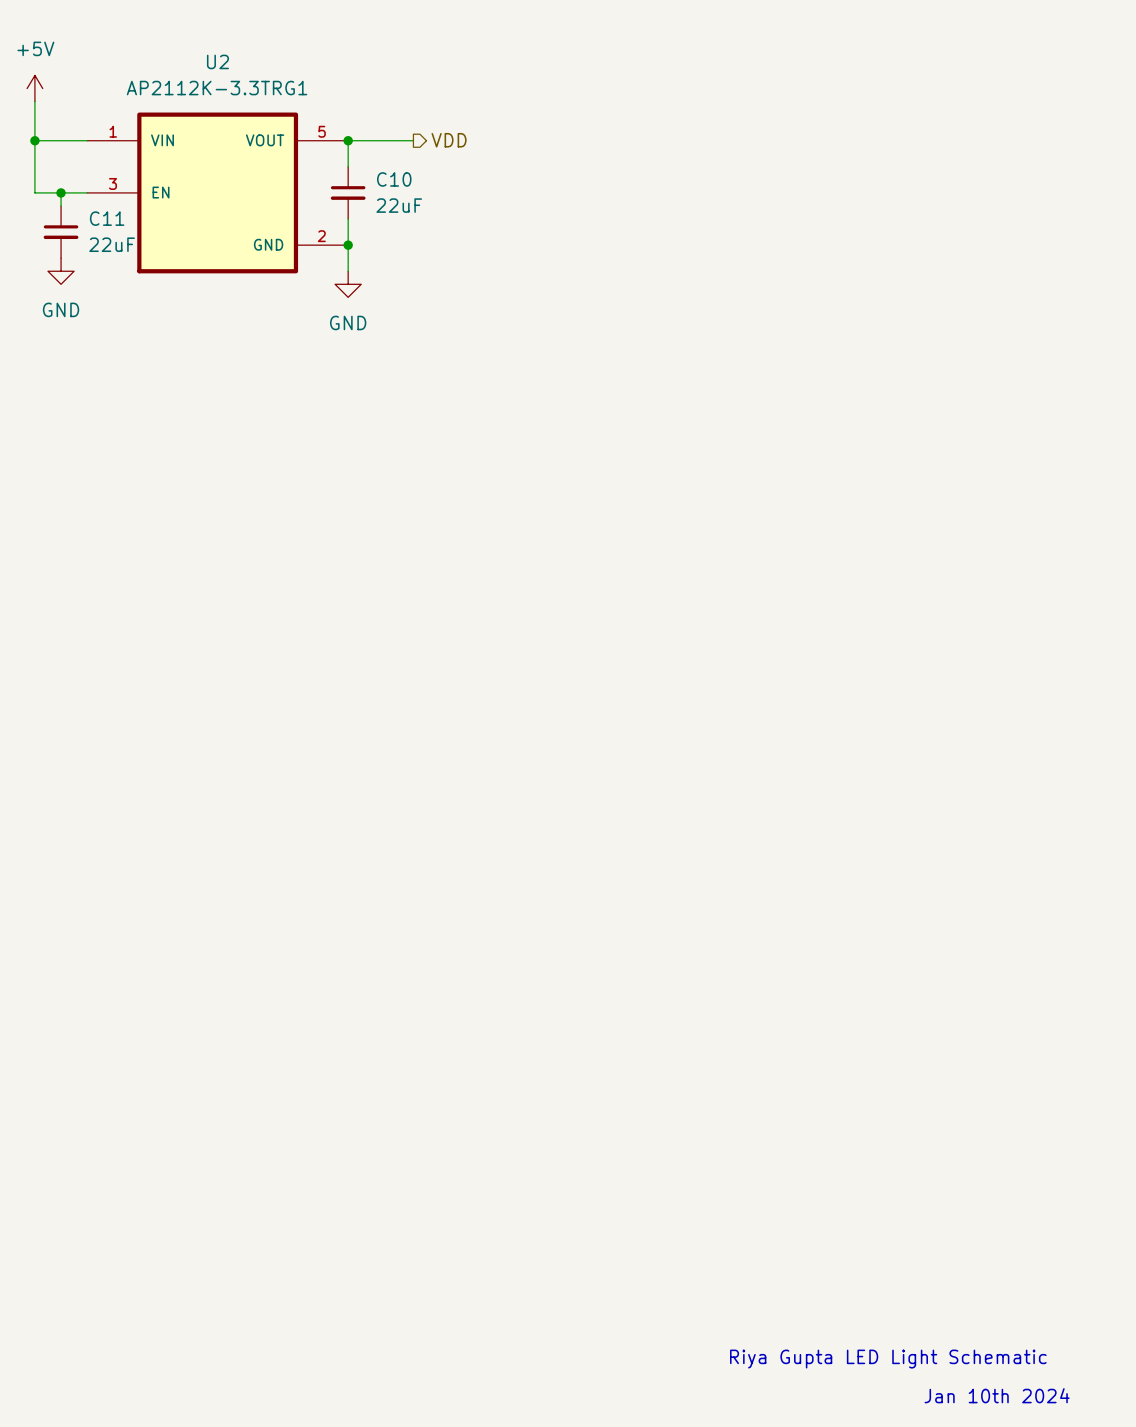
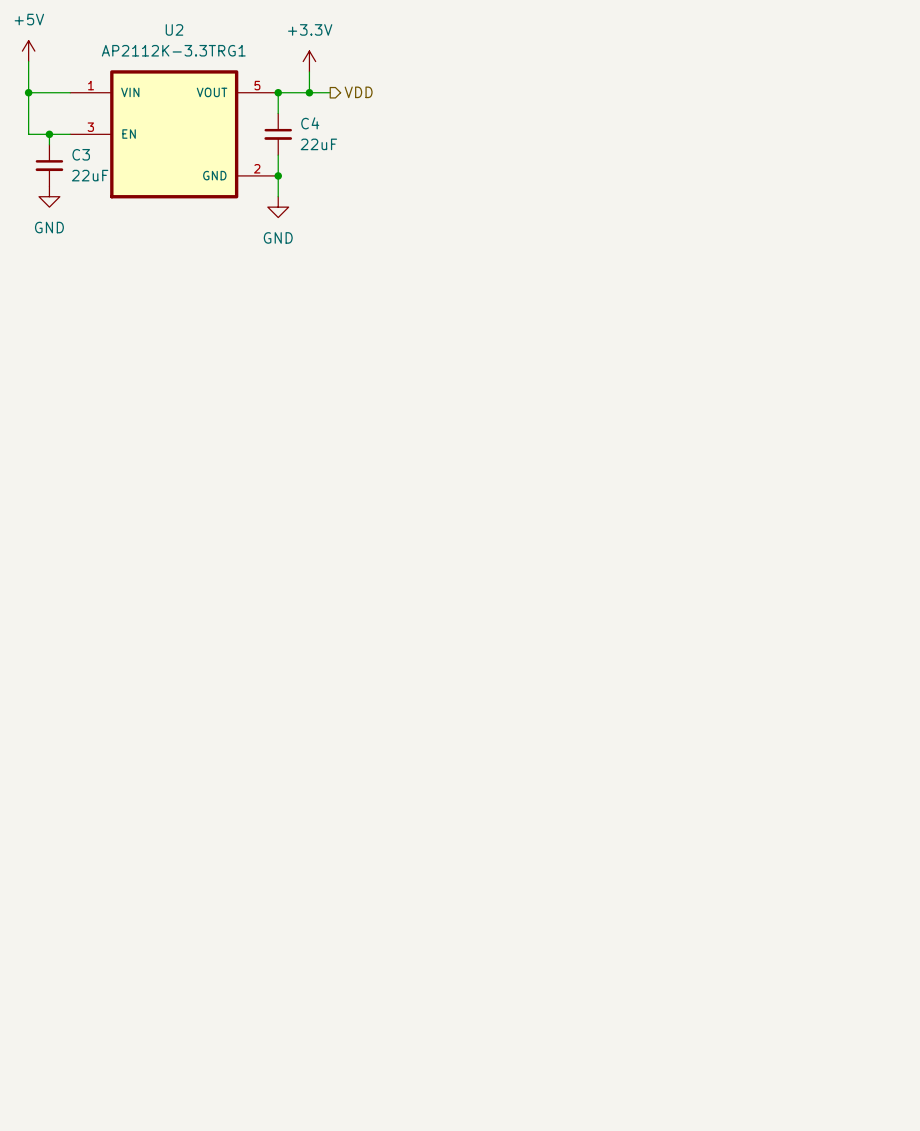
power symbol: none -> +3.3V (309, 61)
wire: none -> (309, 71) (309, 92)
junction: none -> (309, 92)
C10 name: C10 (394, 179) -> C4 (310, 123)
C11 name: C11 (107, 218) -> C3 (81, 154)
text: Riya Gupta LED Light Schematic (888, 1359) -> none
text: Jan 10th 2024 (997, 1395) -> none

